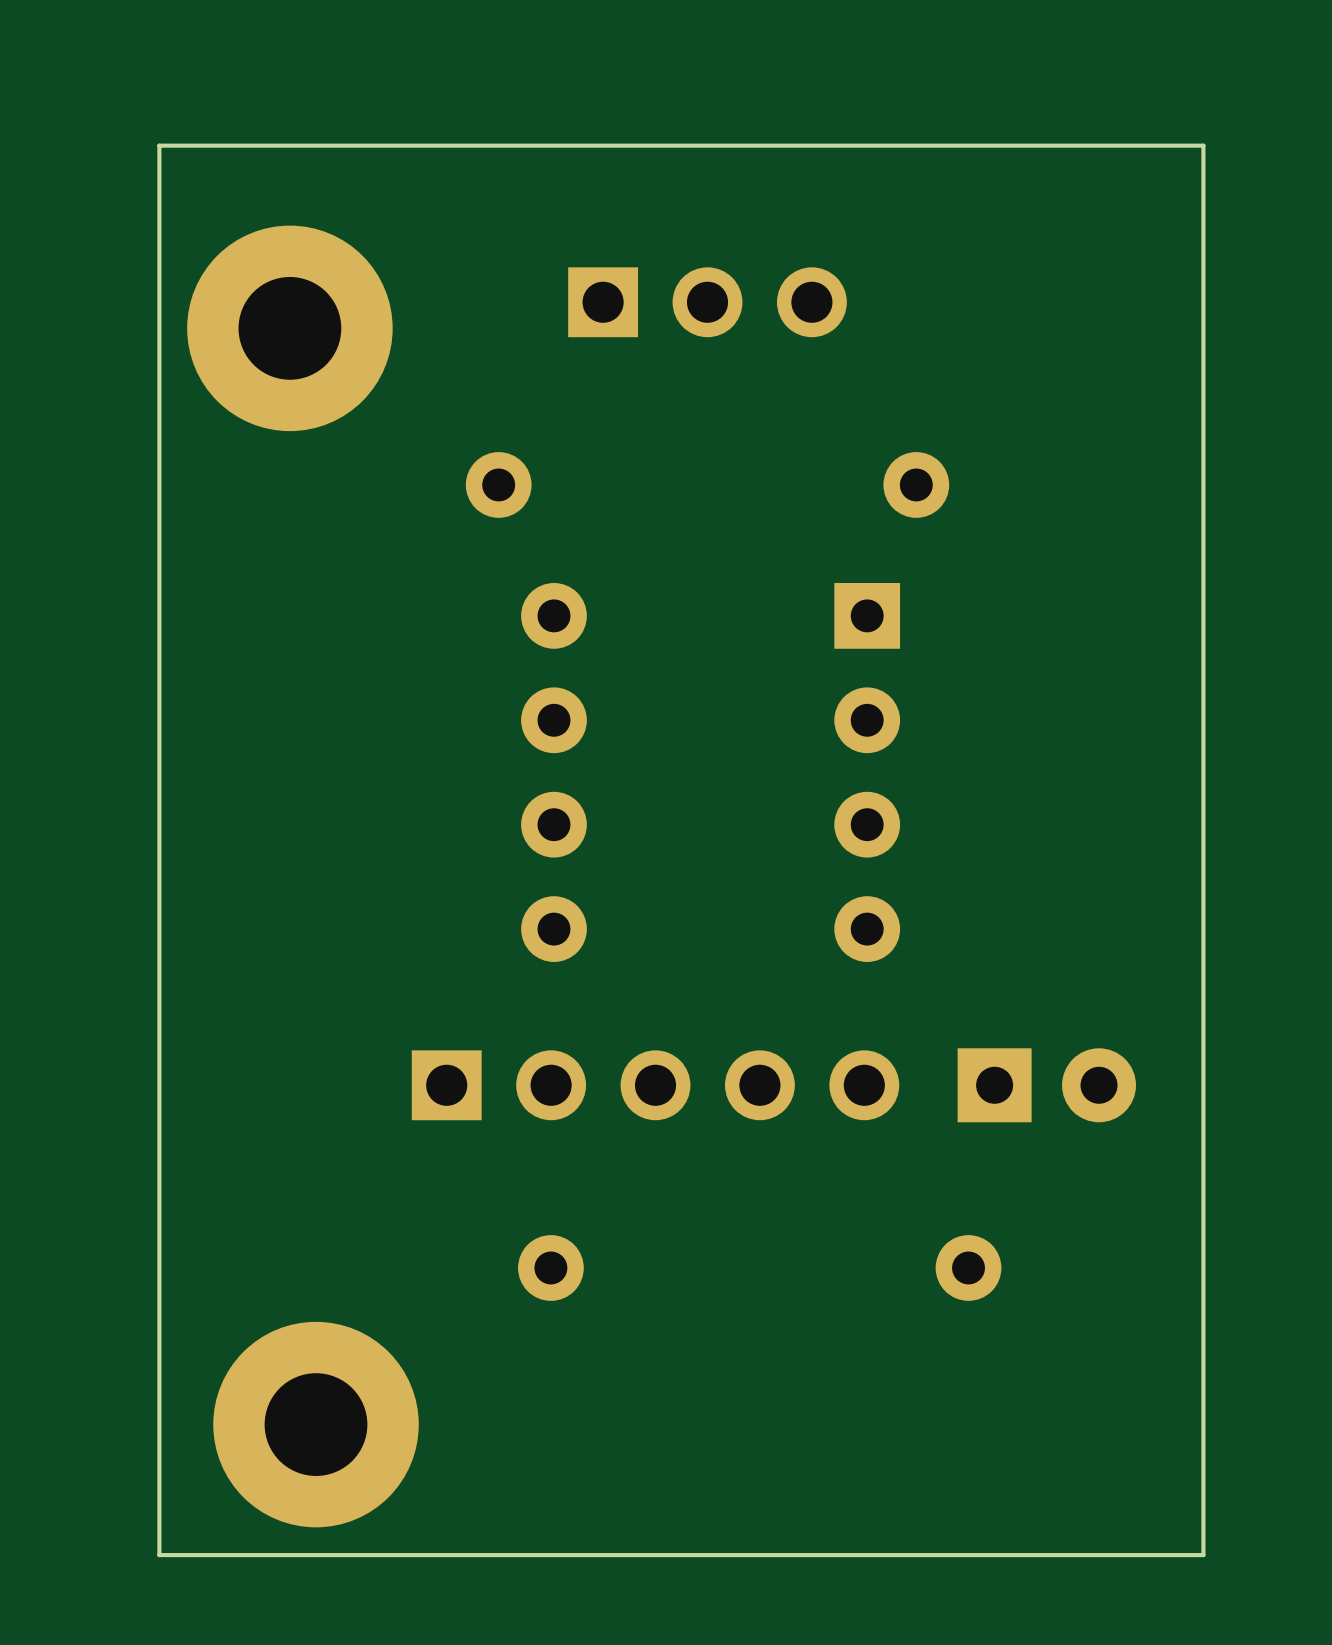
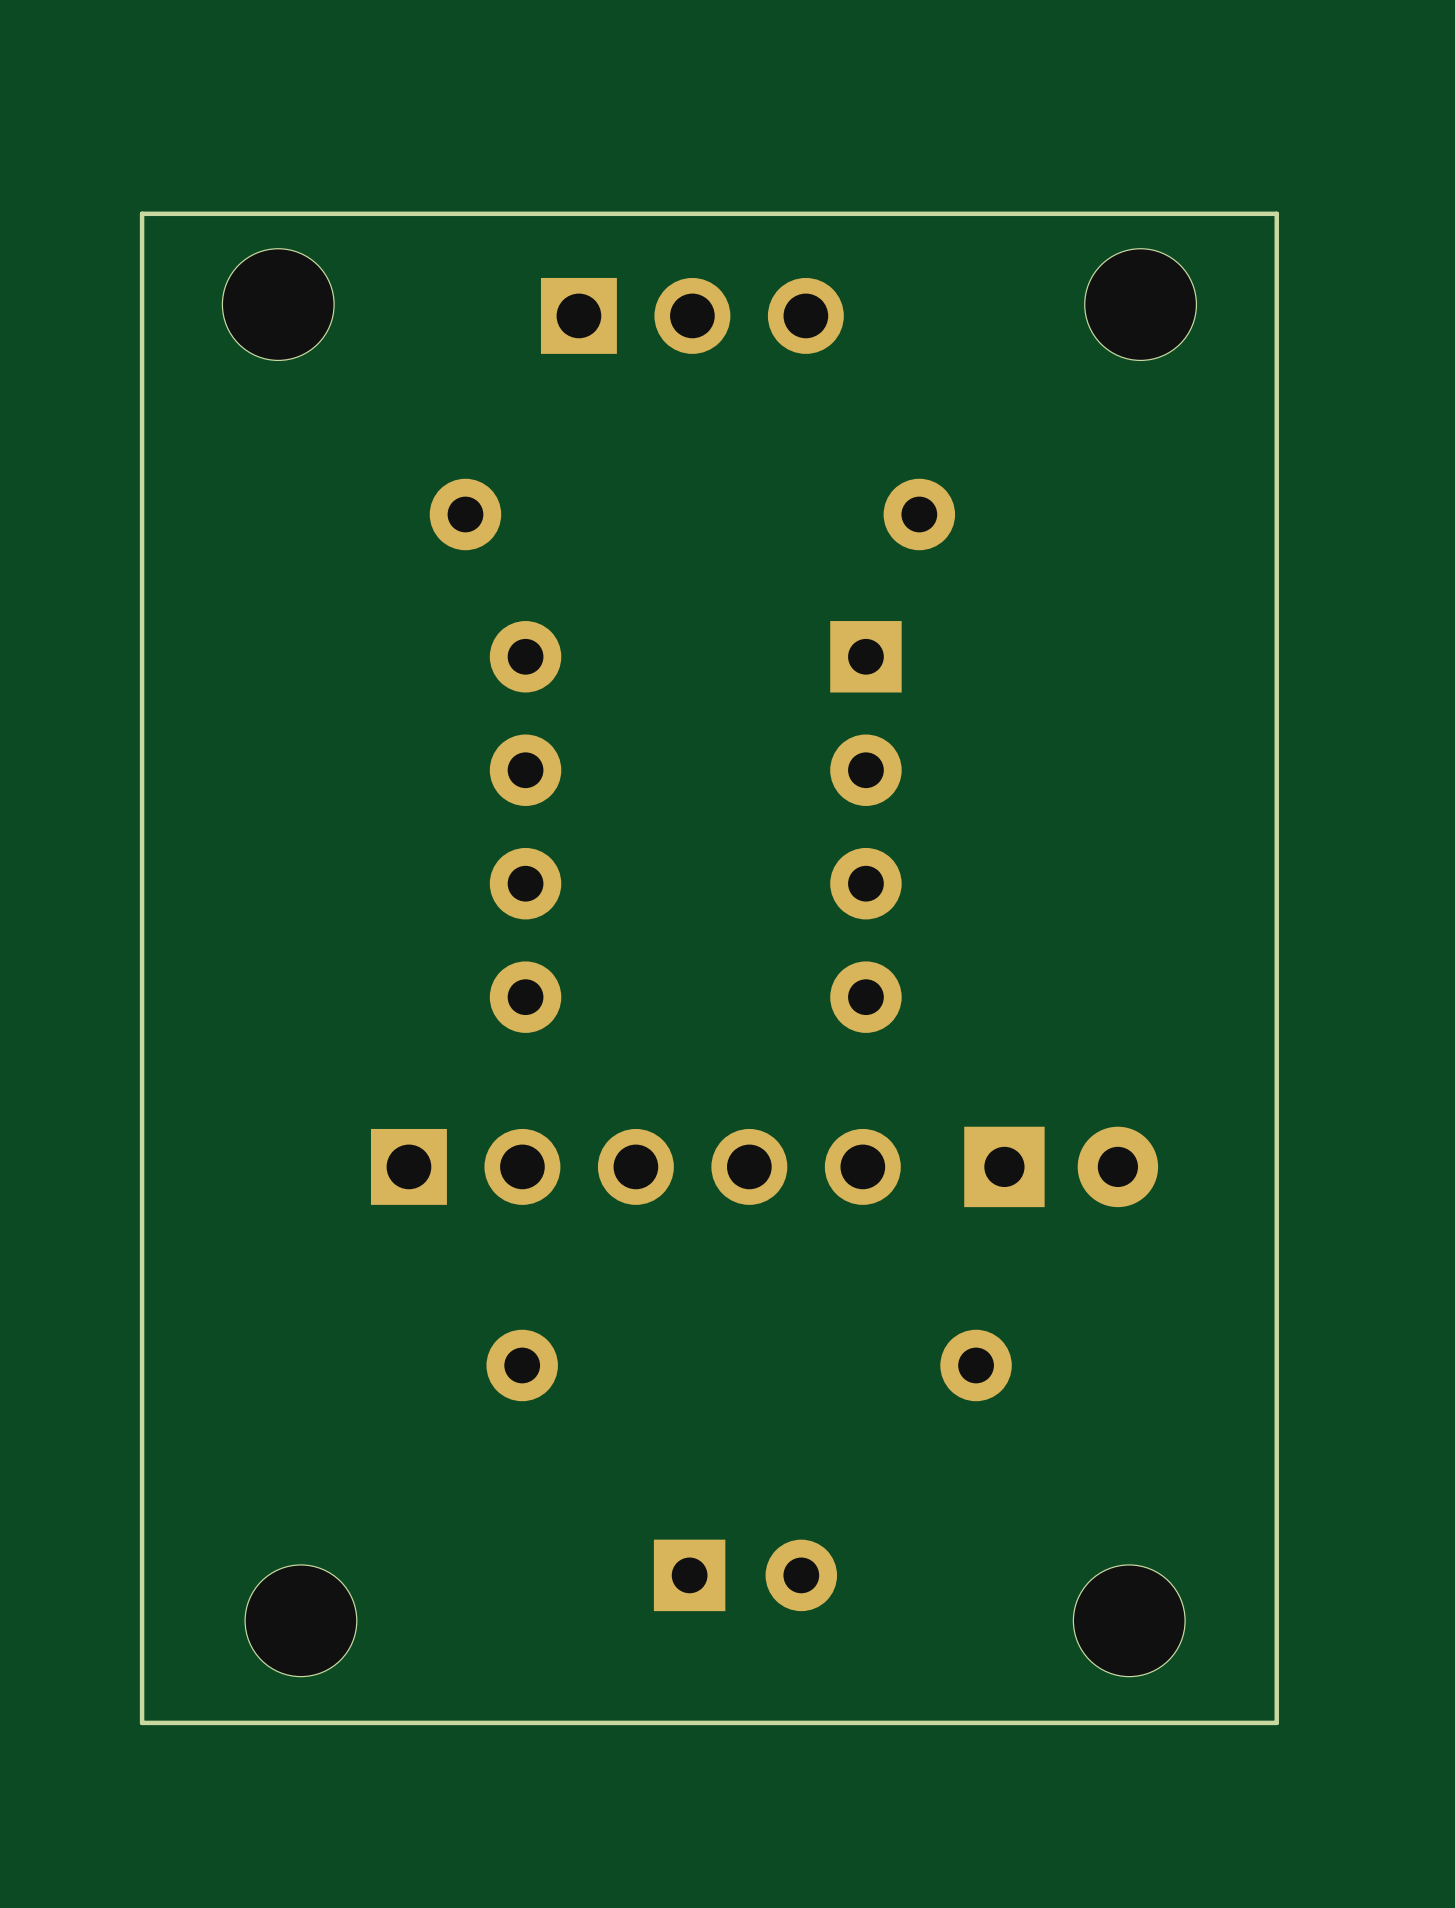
board edge: (1203, 145) (159, 145) (159, 1555) (1203, 1555) (1203, 145) -> (1276, 213) (1276, 1722) (142, 1722) (142, 213) (1276, 213)
part: none -> (278, 304)
part: none -> (1140, 304)
part: (289, 328) -> none
part: (316, 1424) -> none
part: none -> (745, 1575)
part: none -> (300, 1620)
part: none -> (1129, 1620)

